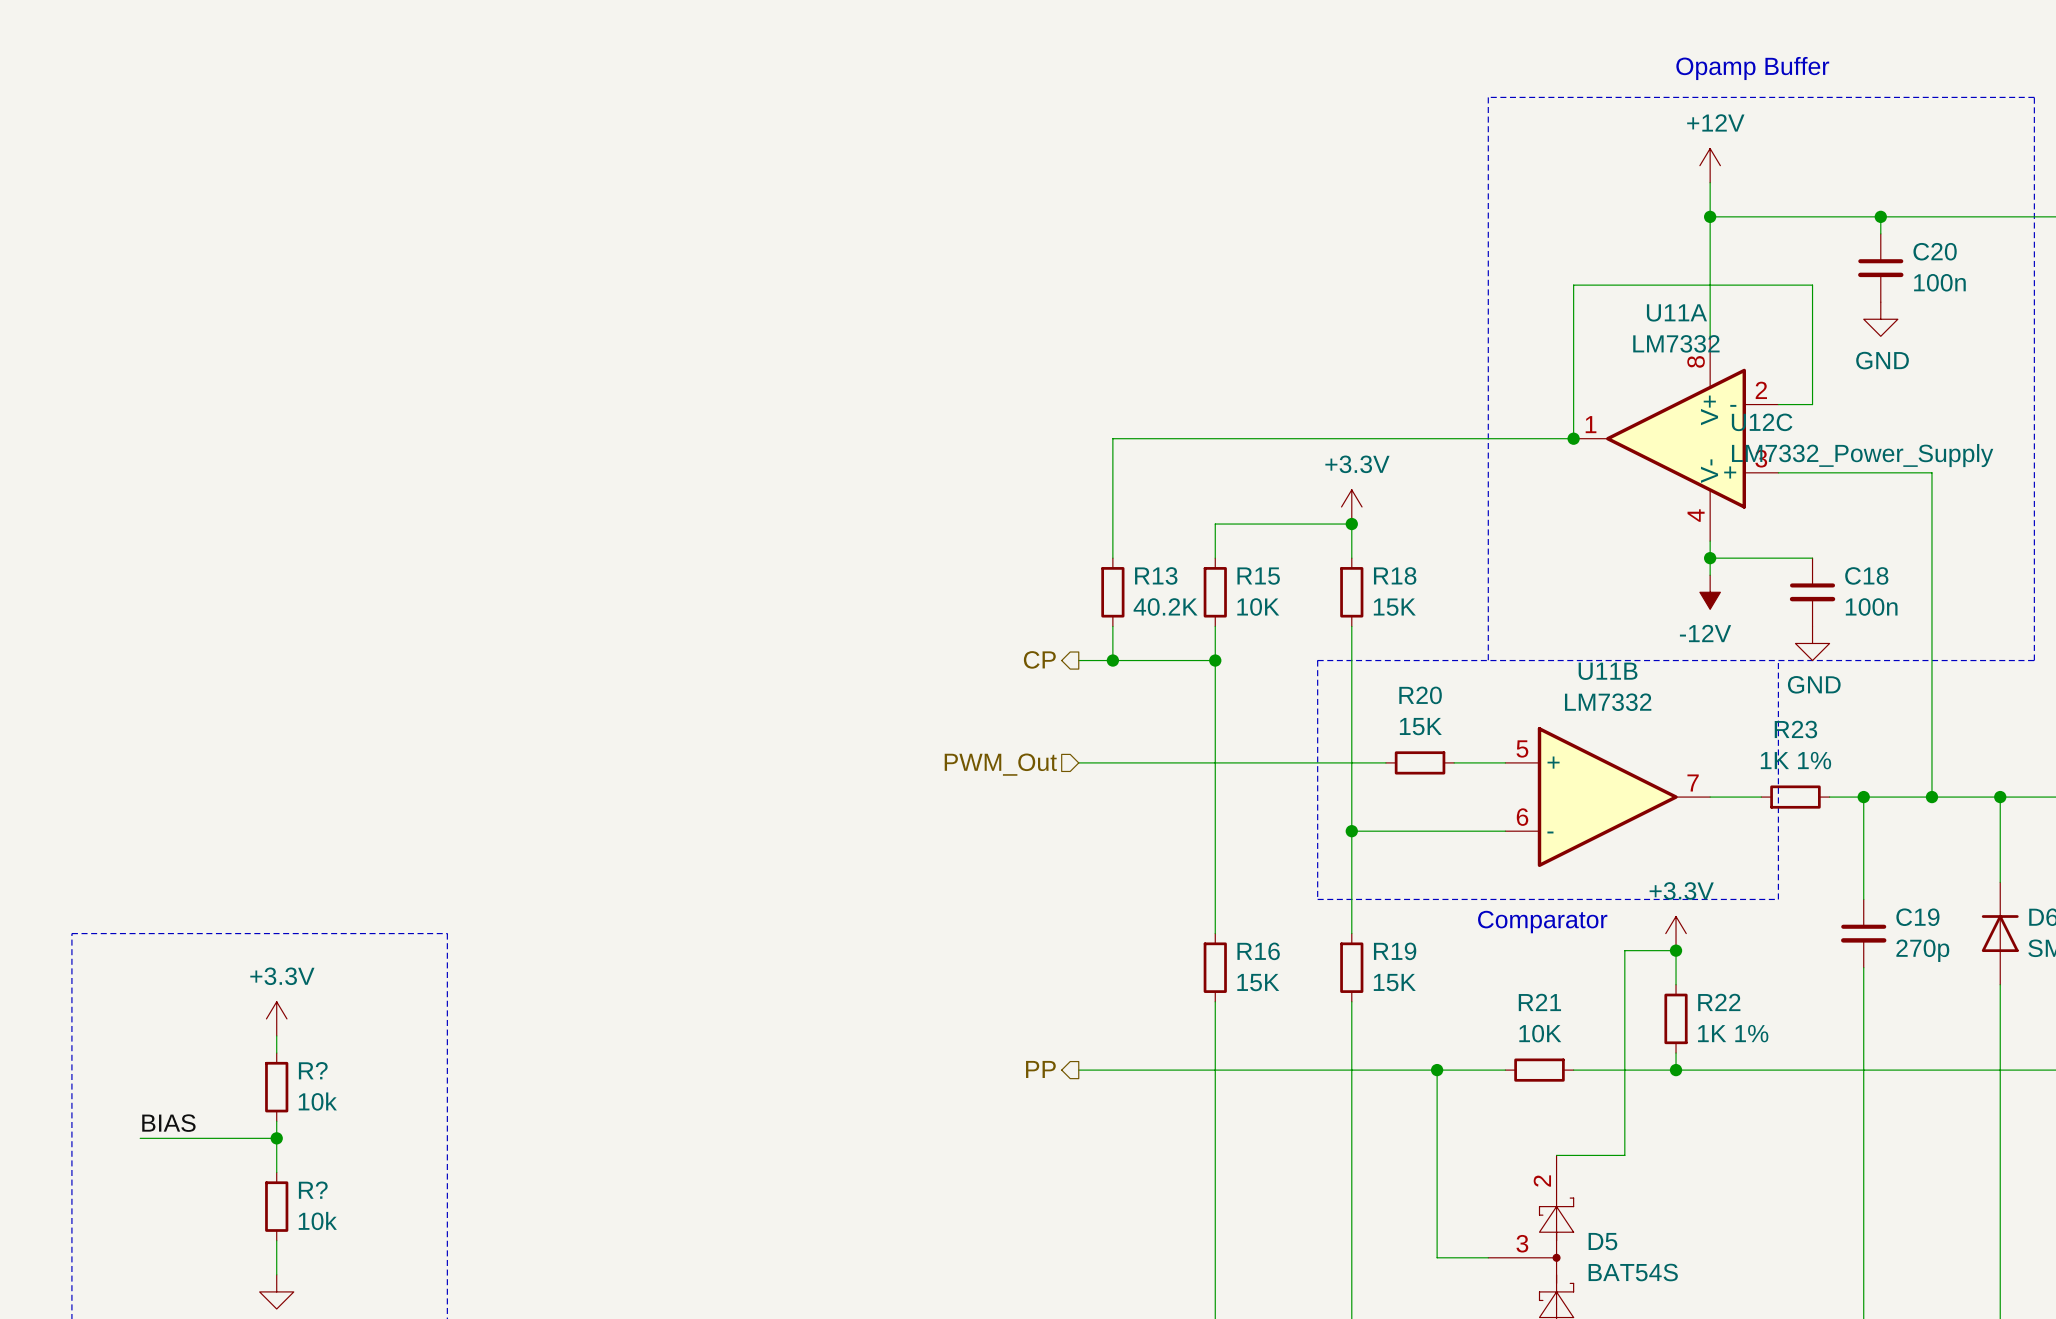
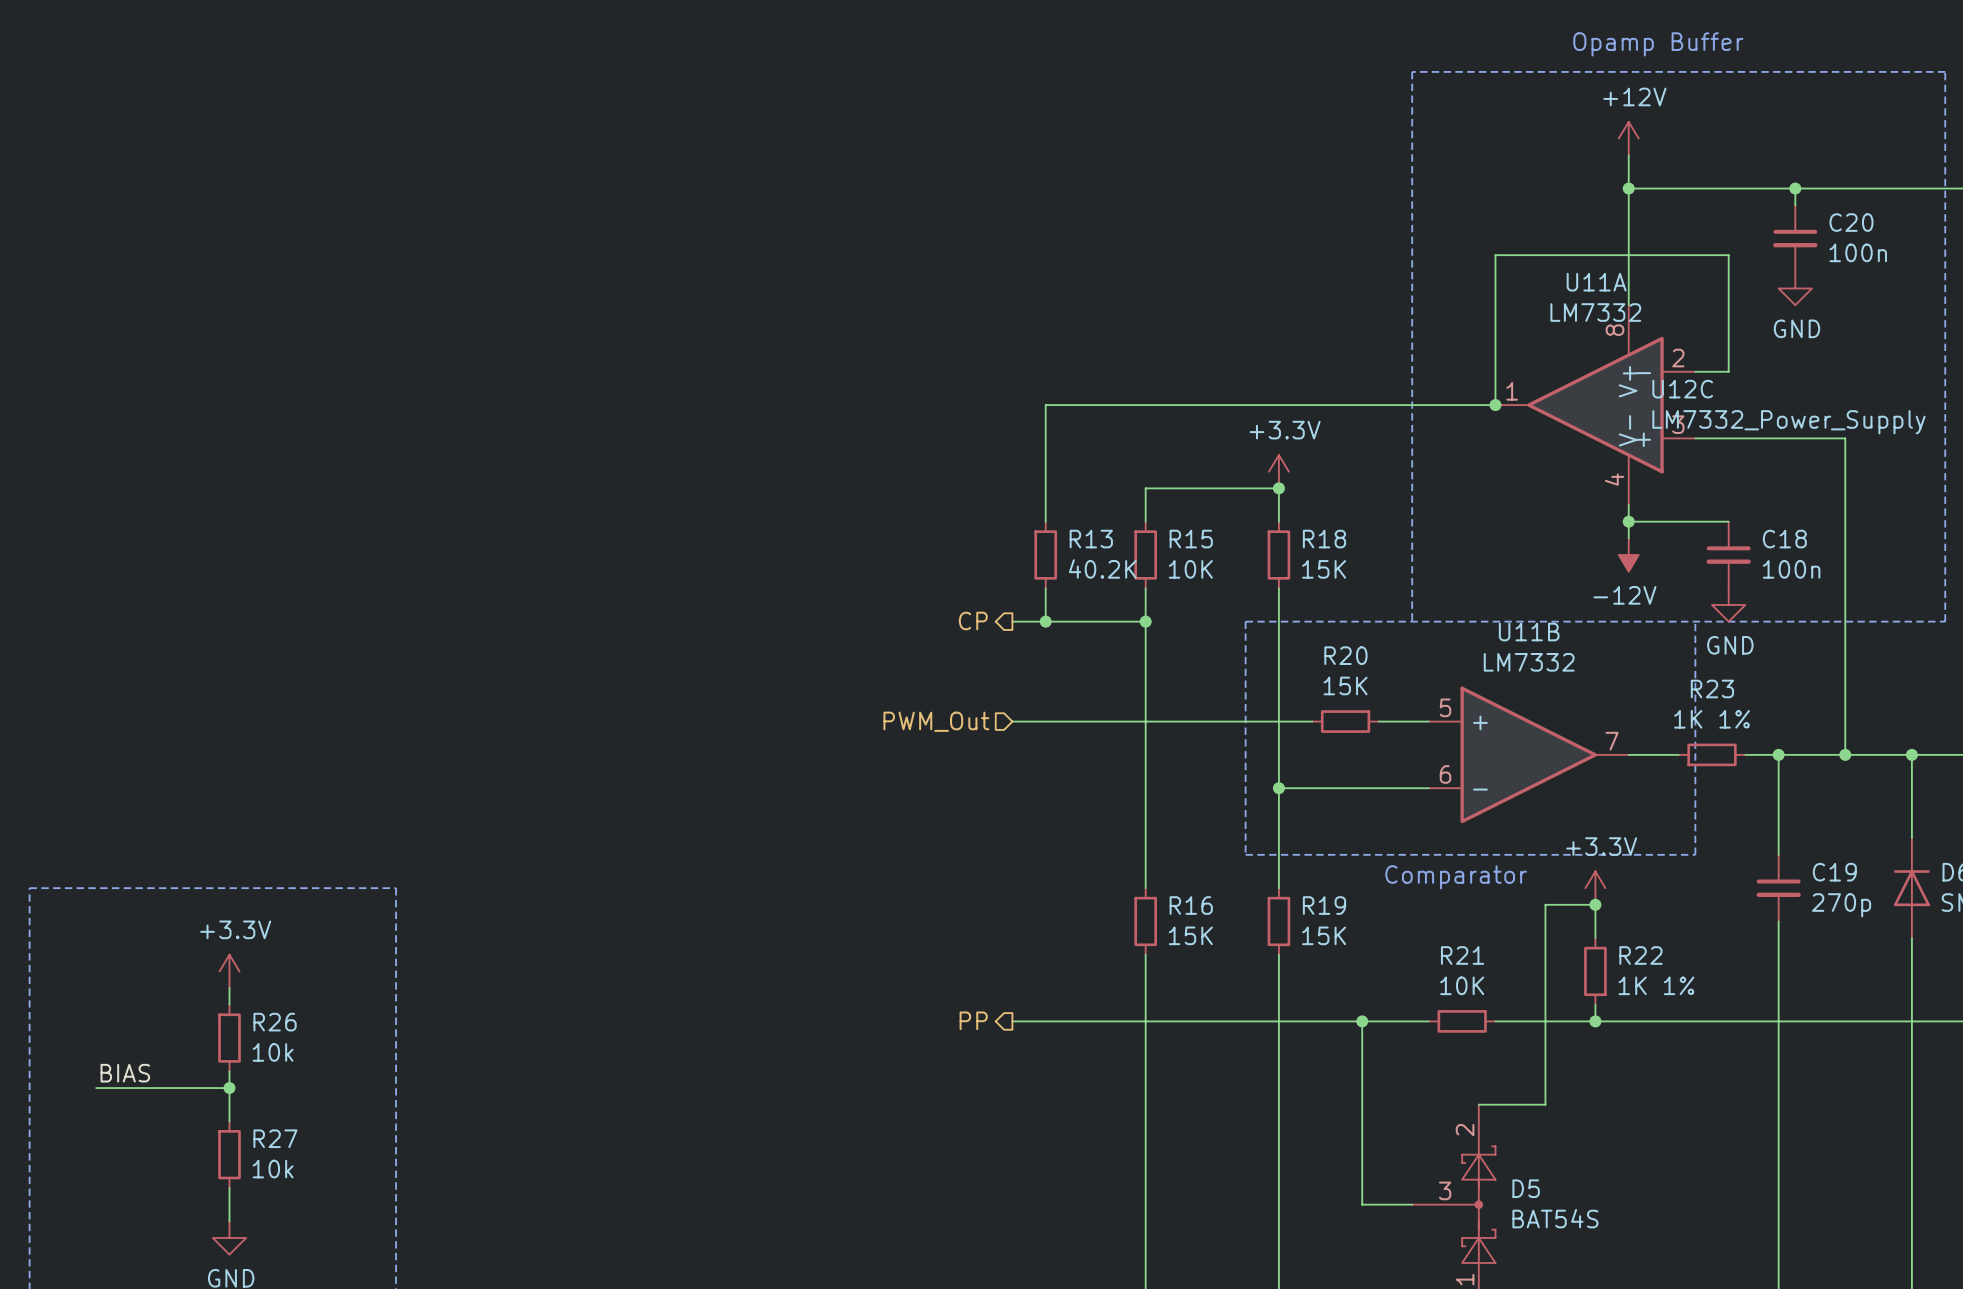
R? name: R? (313, 1070) -> R26 (275, 1022)
R? name: R? (313, 1190) -> R27 (275, 1138)

